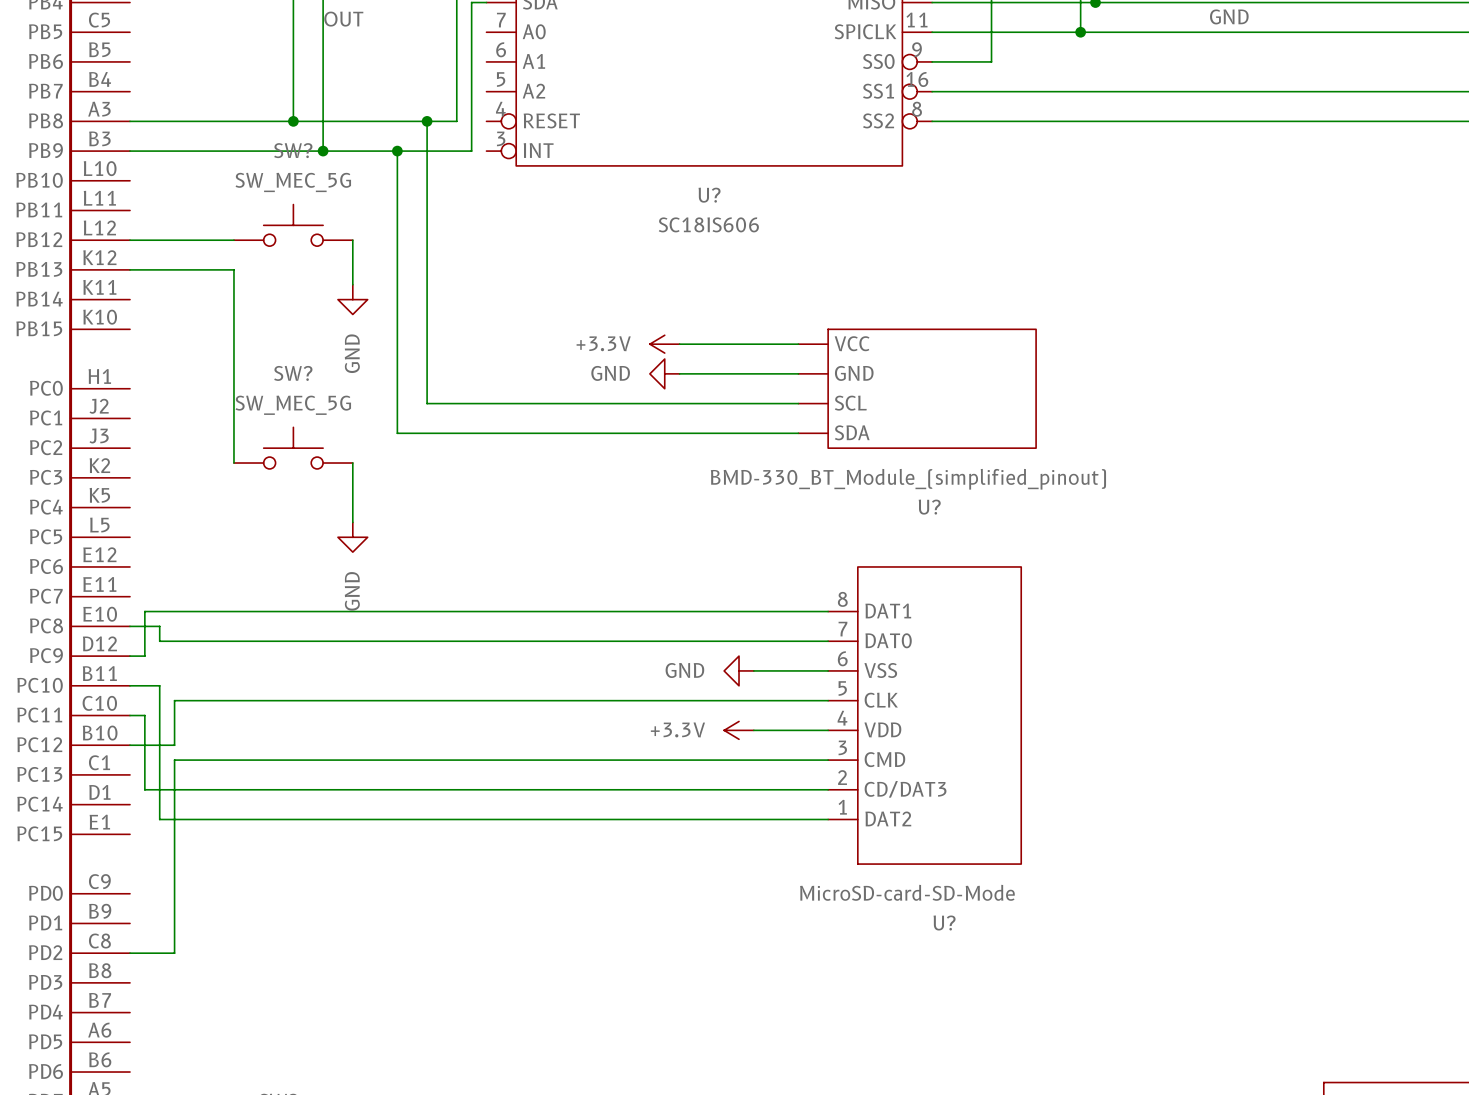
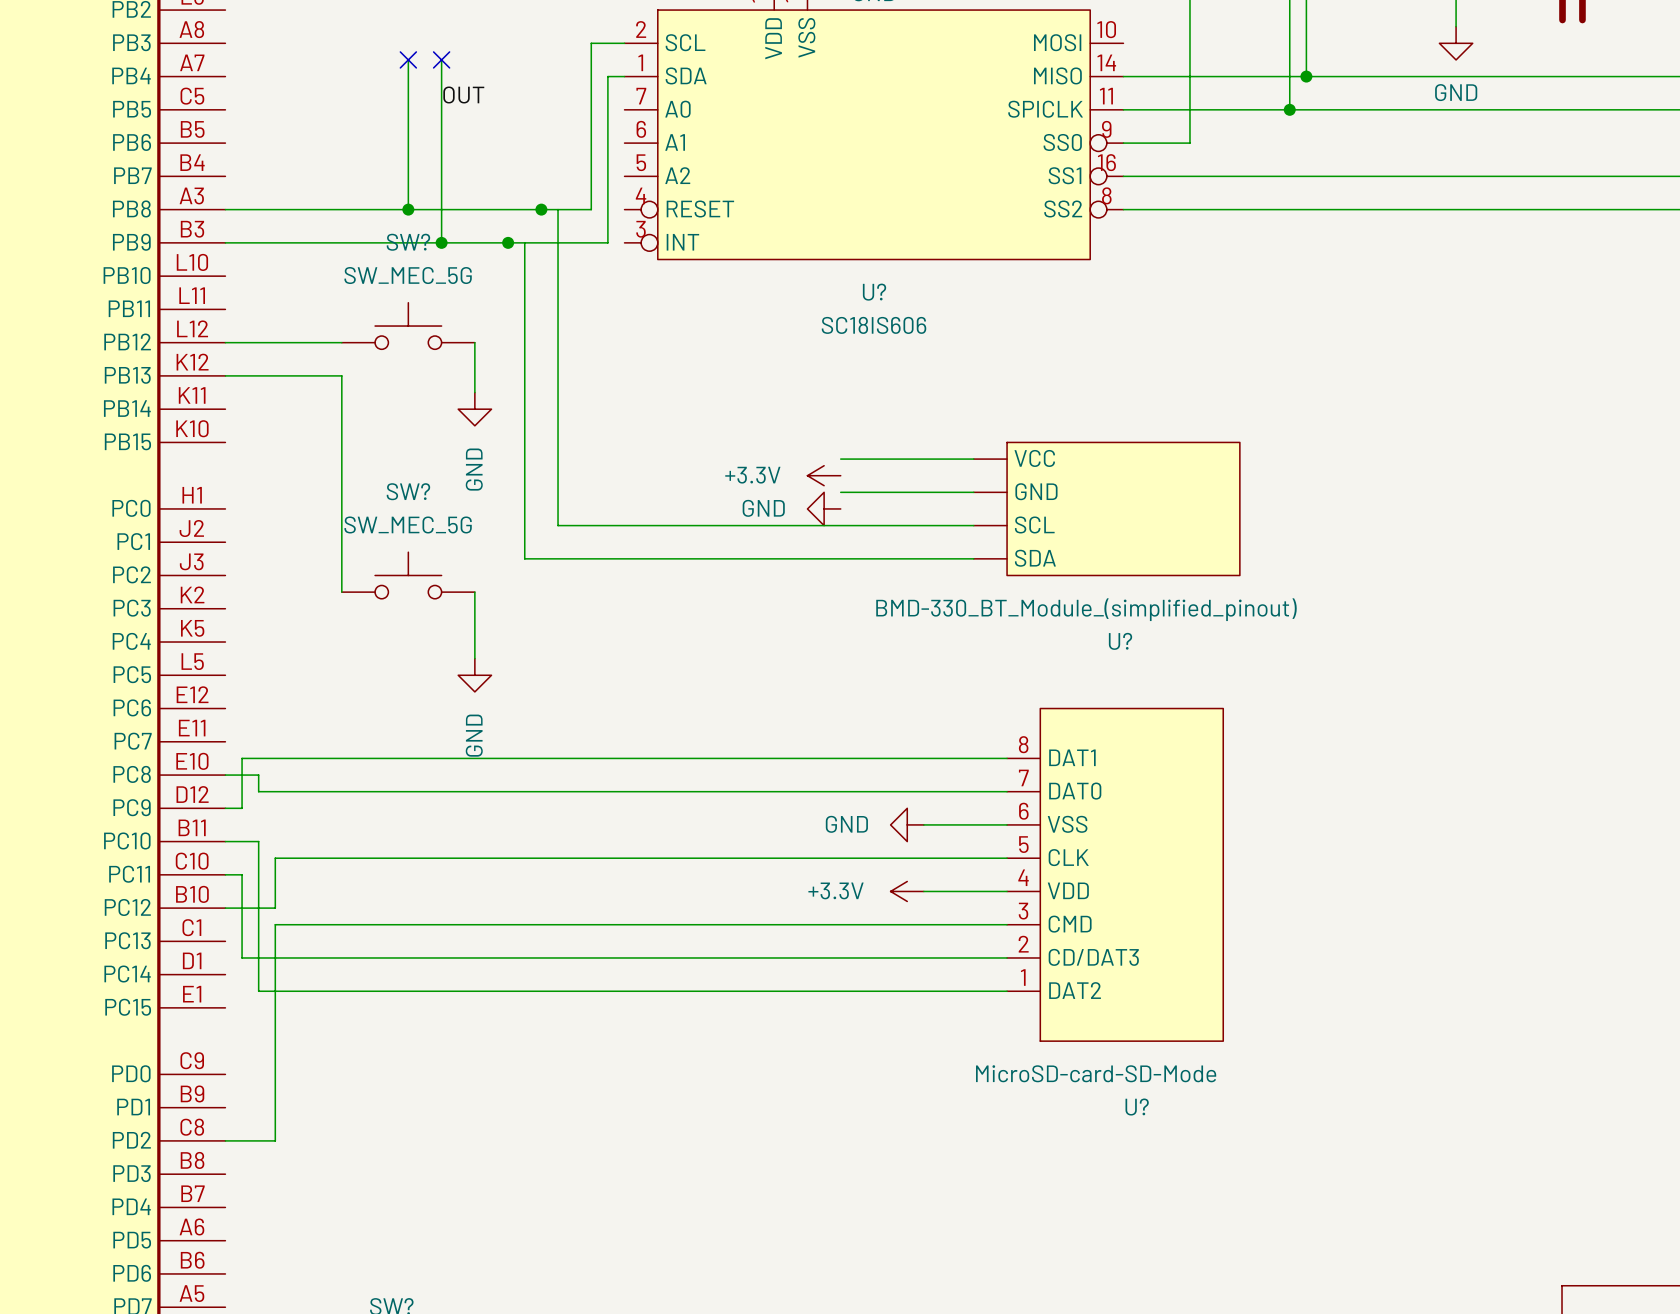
junction position: (427, 121) -> (541, 209)
junction position: (397, 151) -> (508, 242)
power symbol position: +3.3V (664, 344) -> +3.3V (824, 475)
power symbol position: GND (664, 373) -> GND (824, 508)

